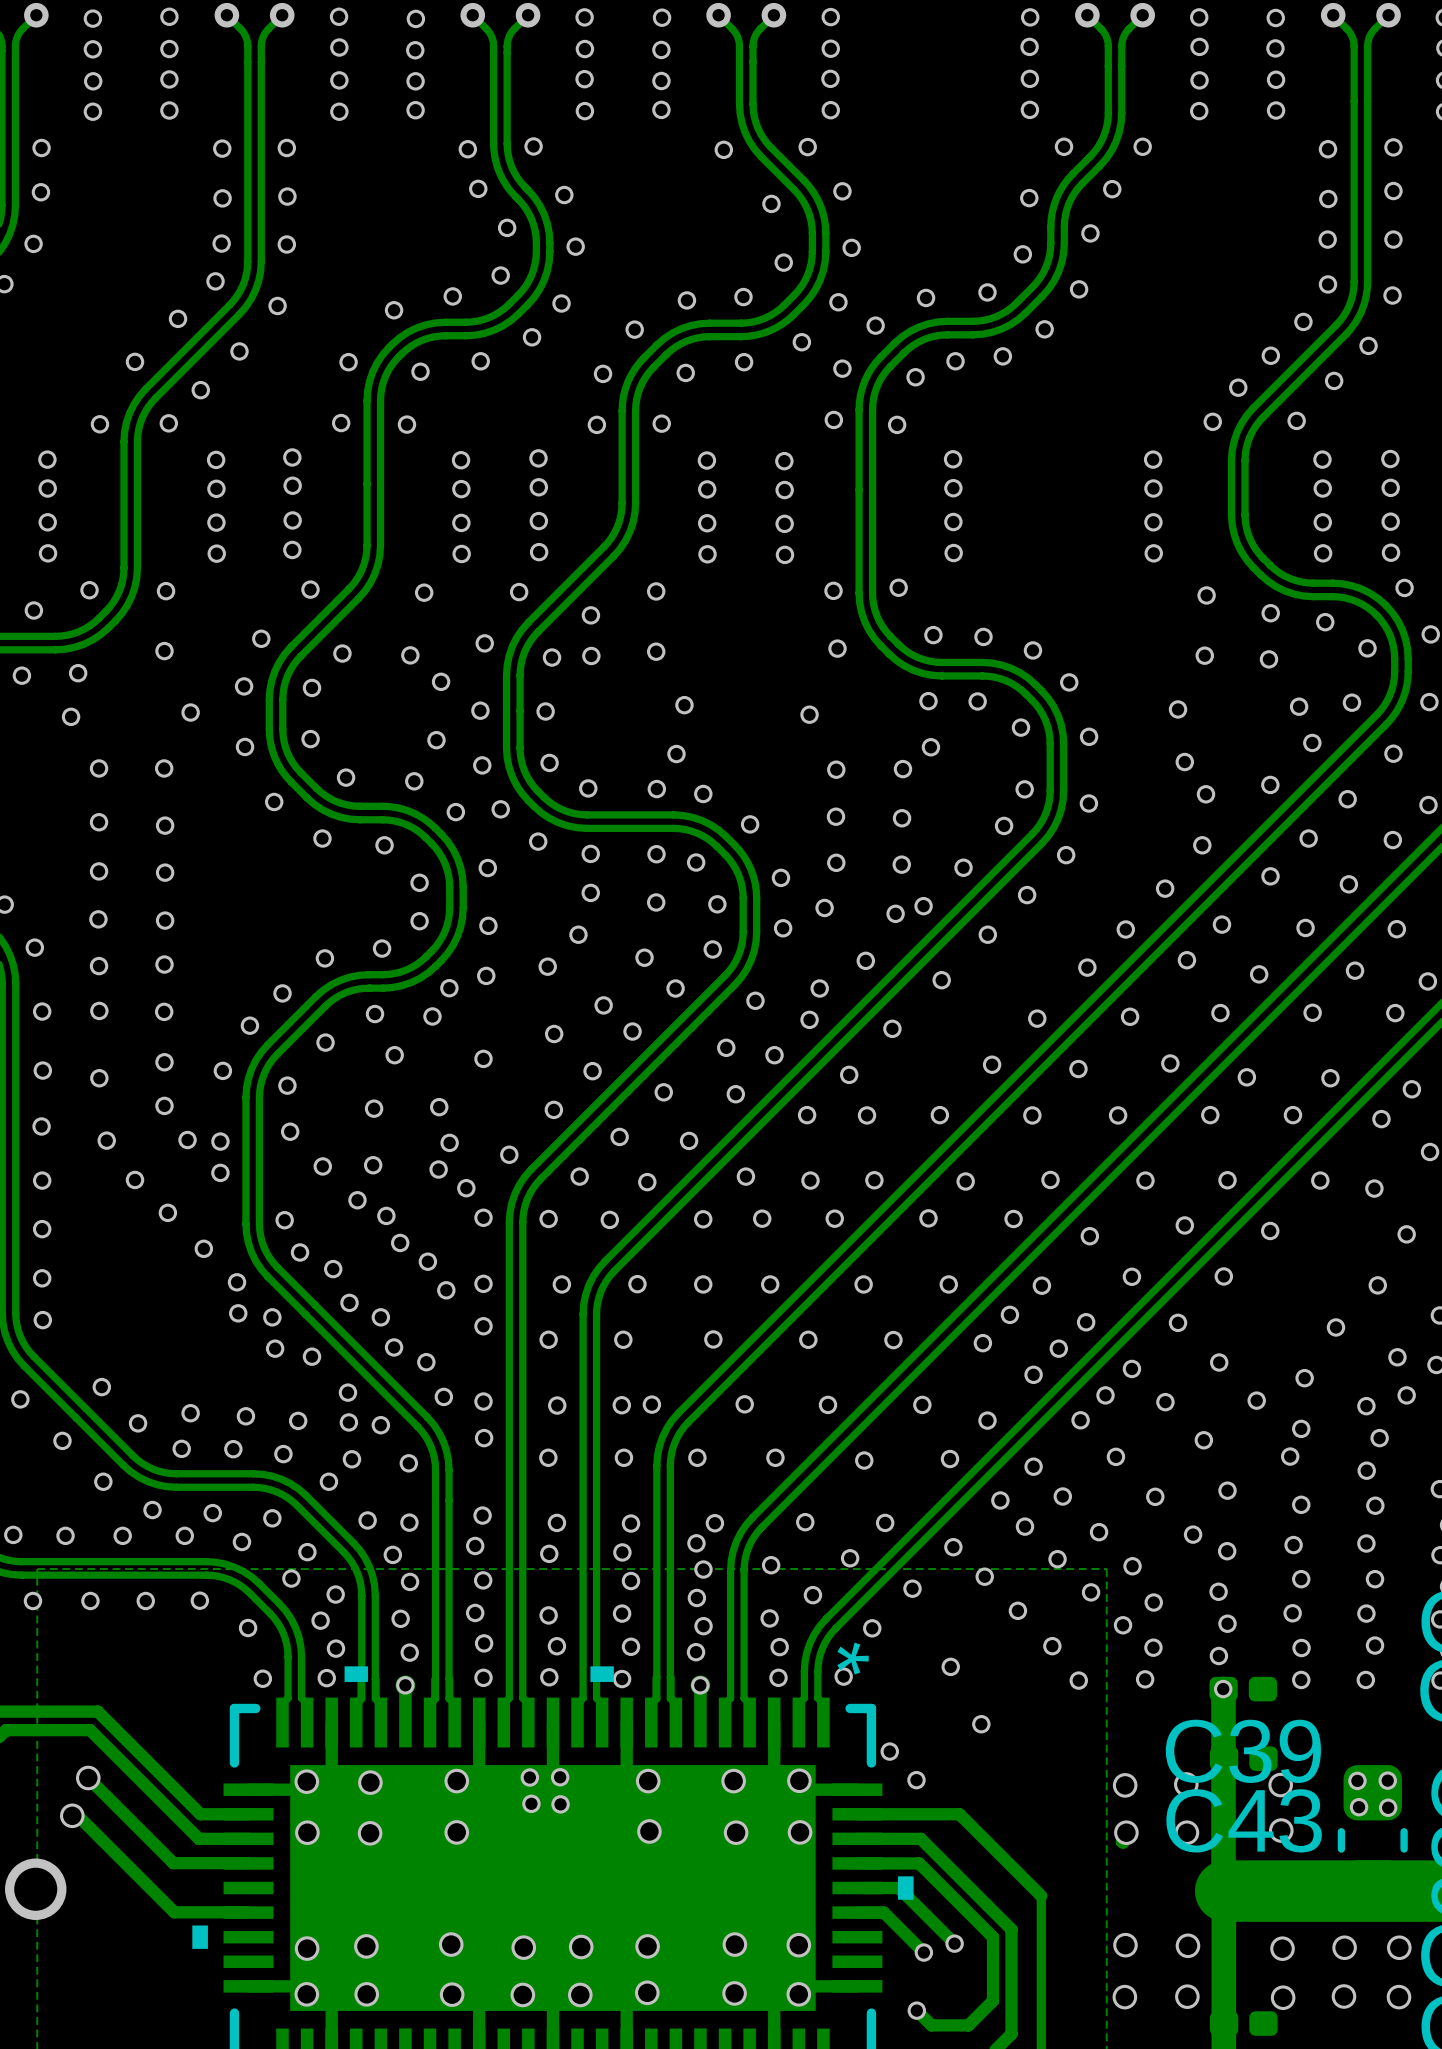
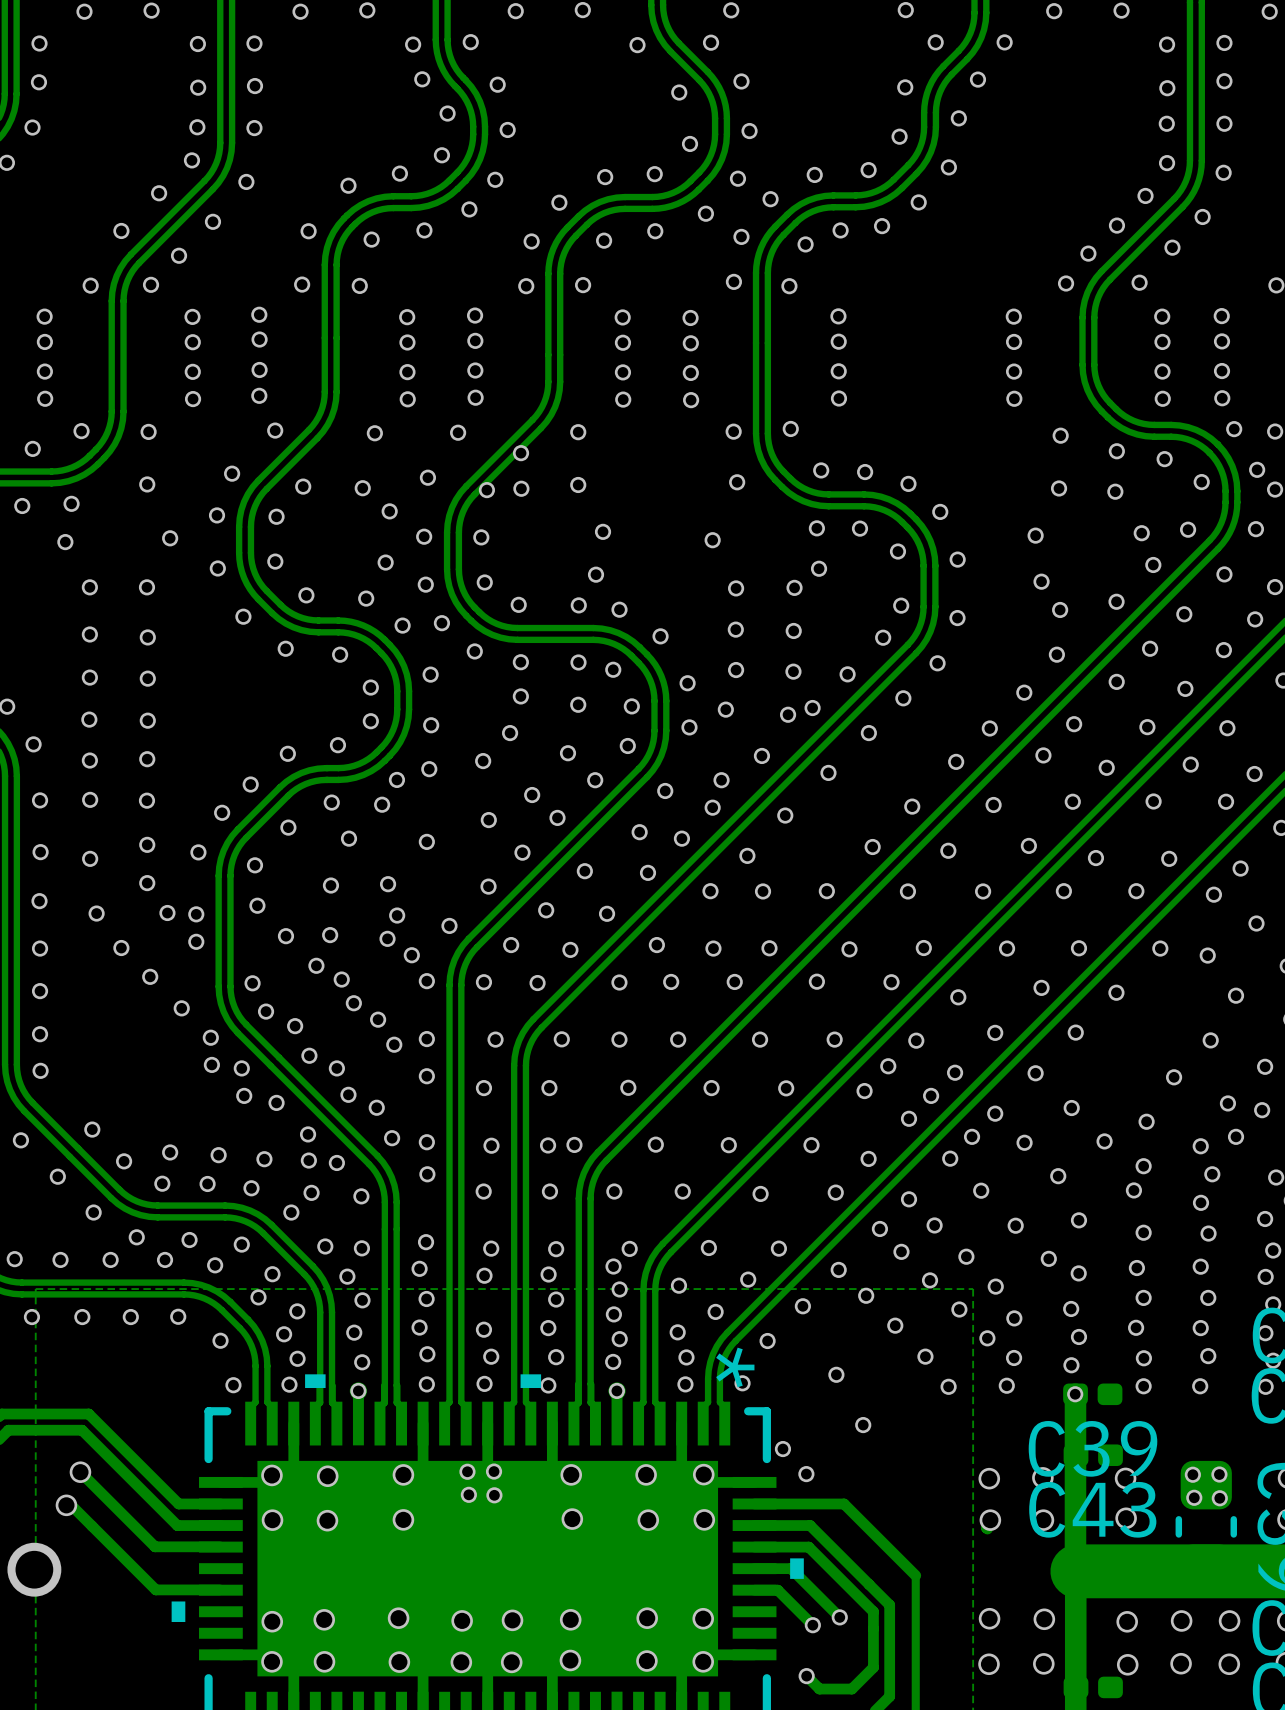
track: (622, 503) (617, 526) (608, 542) (528, 622) (516, 637) (507, 665) (506, 706) -> (548, 354) (548, 387) (541, 407) (532, 419) (460, 492) (449, 515) (447, 532)
track: (635, 503) (633, 522) (620, 548) (538, 631) (527, 646) (520, 669) (520, 706) -> (560, 354) (559, 390) (551, 414) (540, 428) (471, 498) (462, 512) (458, 532)

